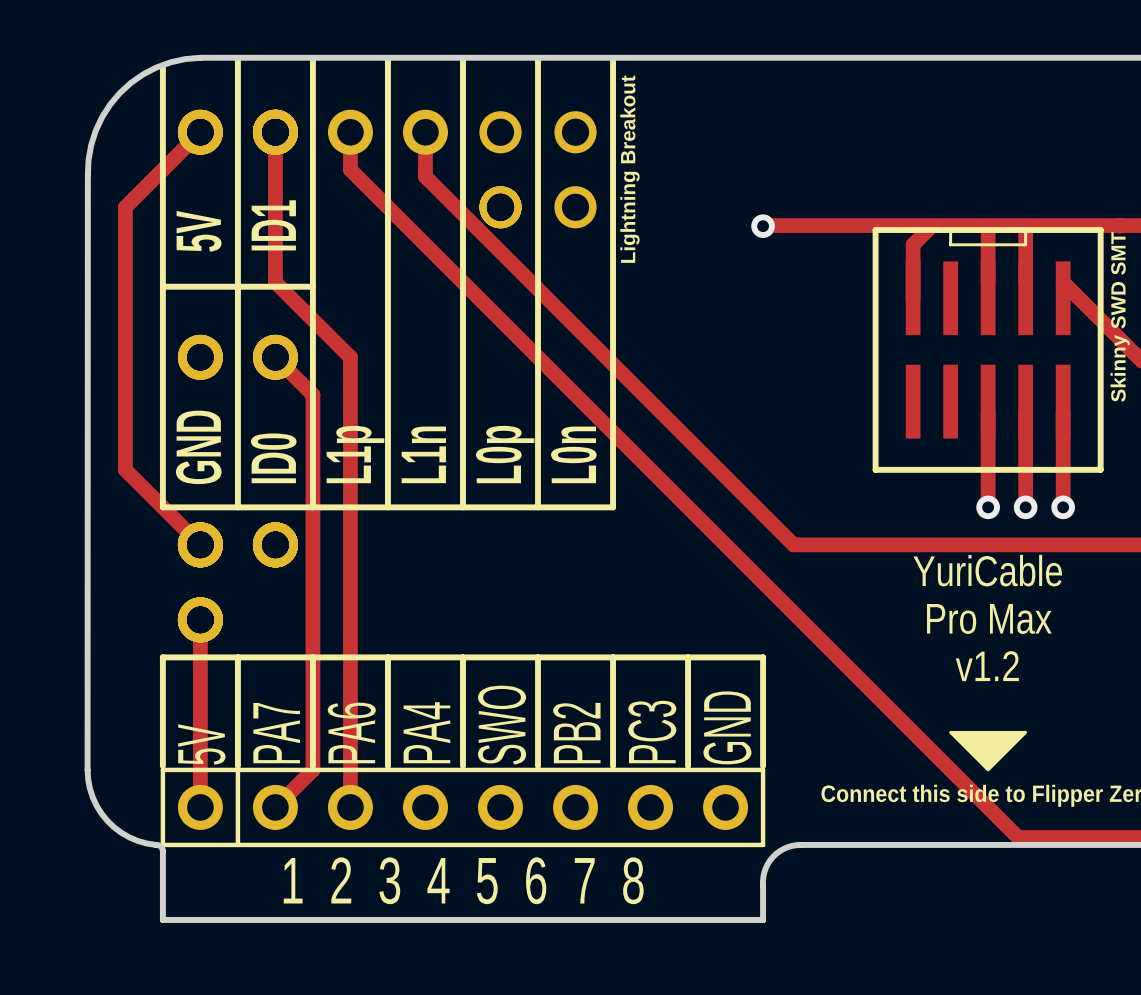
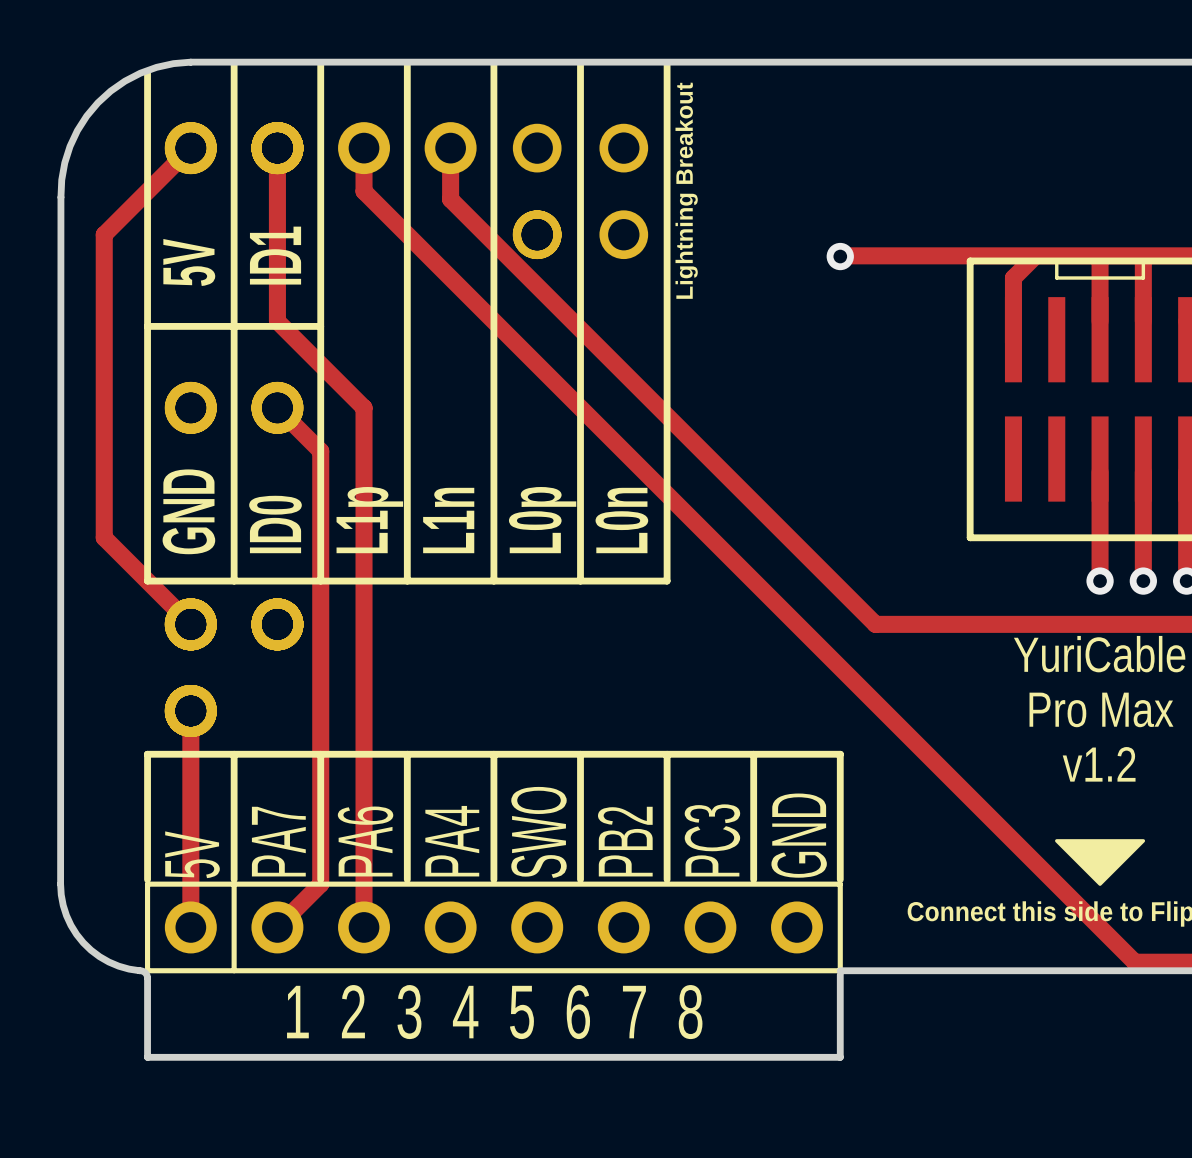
board edge: none -> (840, 970) (883, 970)
board edge: (800, 844) (783, 849) (772, 857) (765, 868) (763, 885) -> (840, 974) (840, 1017)

